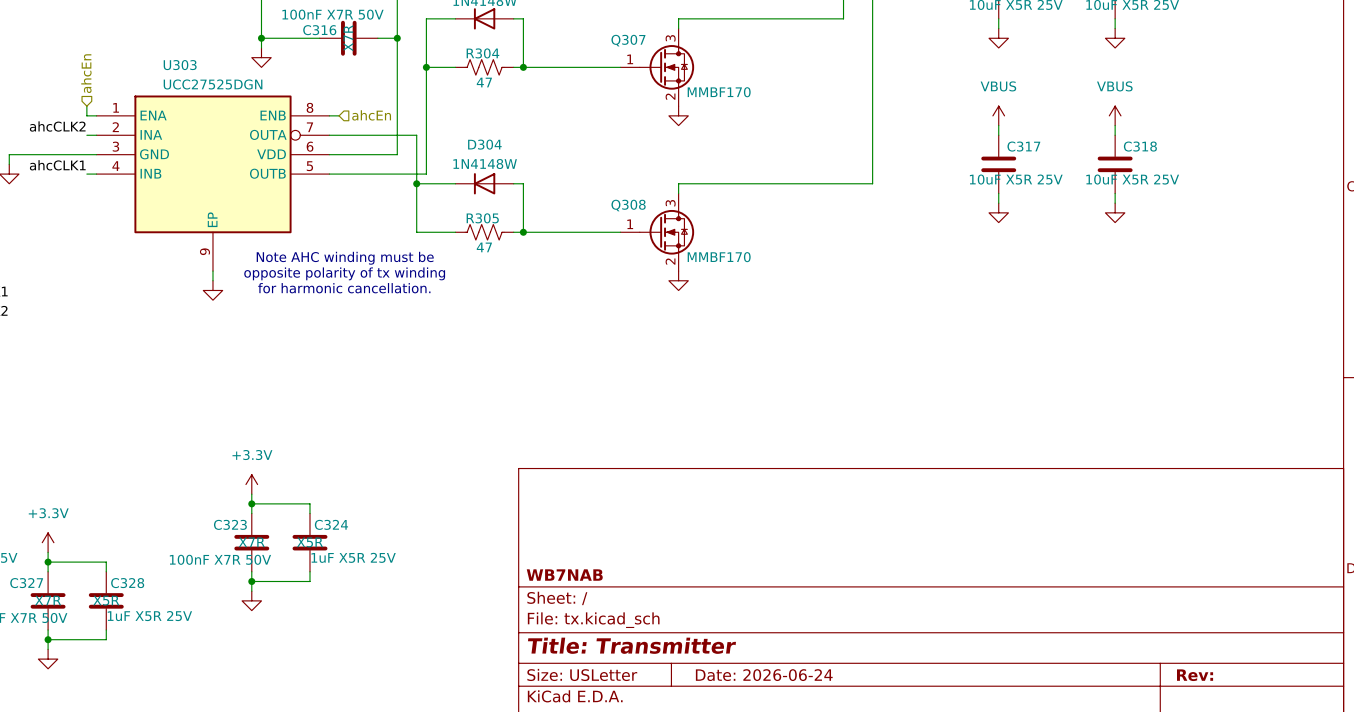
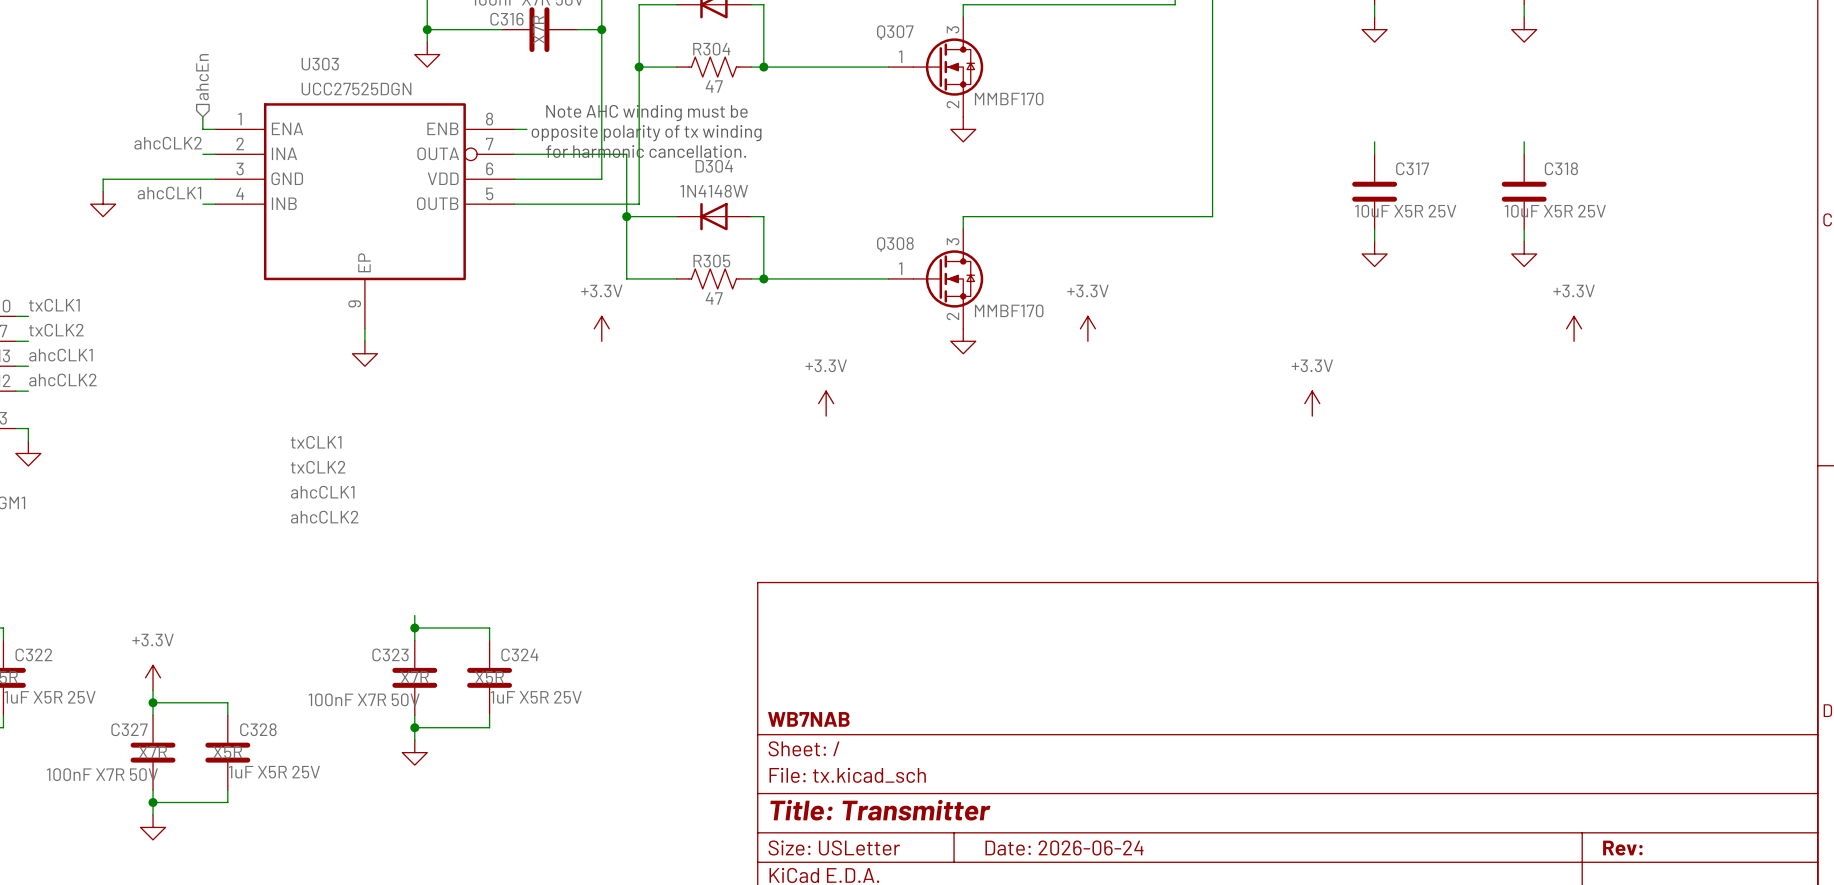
hierarchical label: ahcEn (371, 115) -> none
power symbol: VBUS (998, 115) -> none
power symbol: VBUS (1115, 115) -> none
text position: Note AHC winding must be (345, 258) -> Note AHC winding must be (646, 113)
power symbol: none -> +3.3V (601, 328)
power symbol: none -> +3.3V (1087, 328)
power symbol: none -> +3.3V (1574, 328)
text position: opposite polarity of tx winding (344, 273) -> opposite polarity of tx winding (646, 133)
text position: for harmonic cancellation. (344, 288) -> for harmonic cancellation. (646, 151)
power symbol: none -> +3.3V (826, 403)
power symbol: none -> +3.3V (1312, 403)
label: none -> txCLK1 (316, 442)
label: none -> txCLK2 (318, 467)
label: none -> ahcCLK1 (322, 492)
label: none -> ahcCLK2 (324, 517)
power symbol: +3.3V (251, 484) -> none

